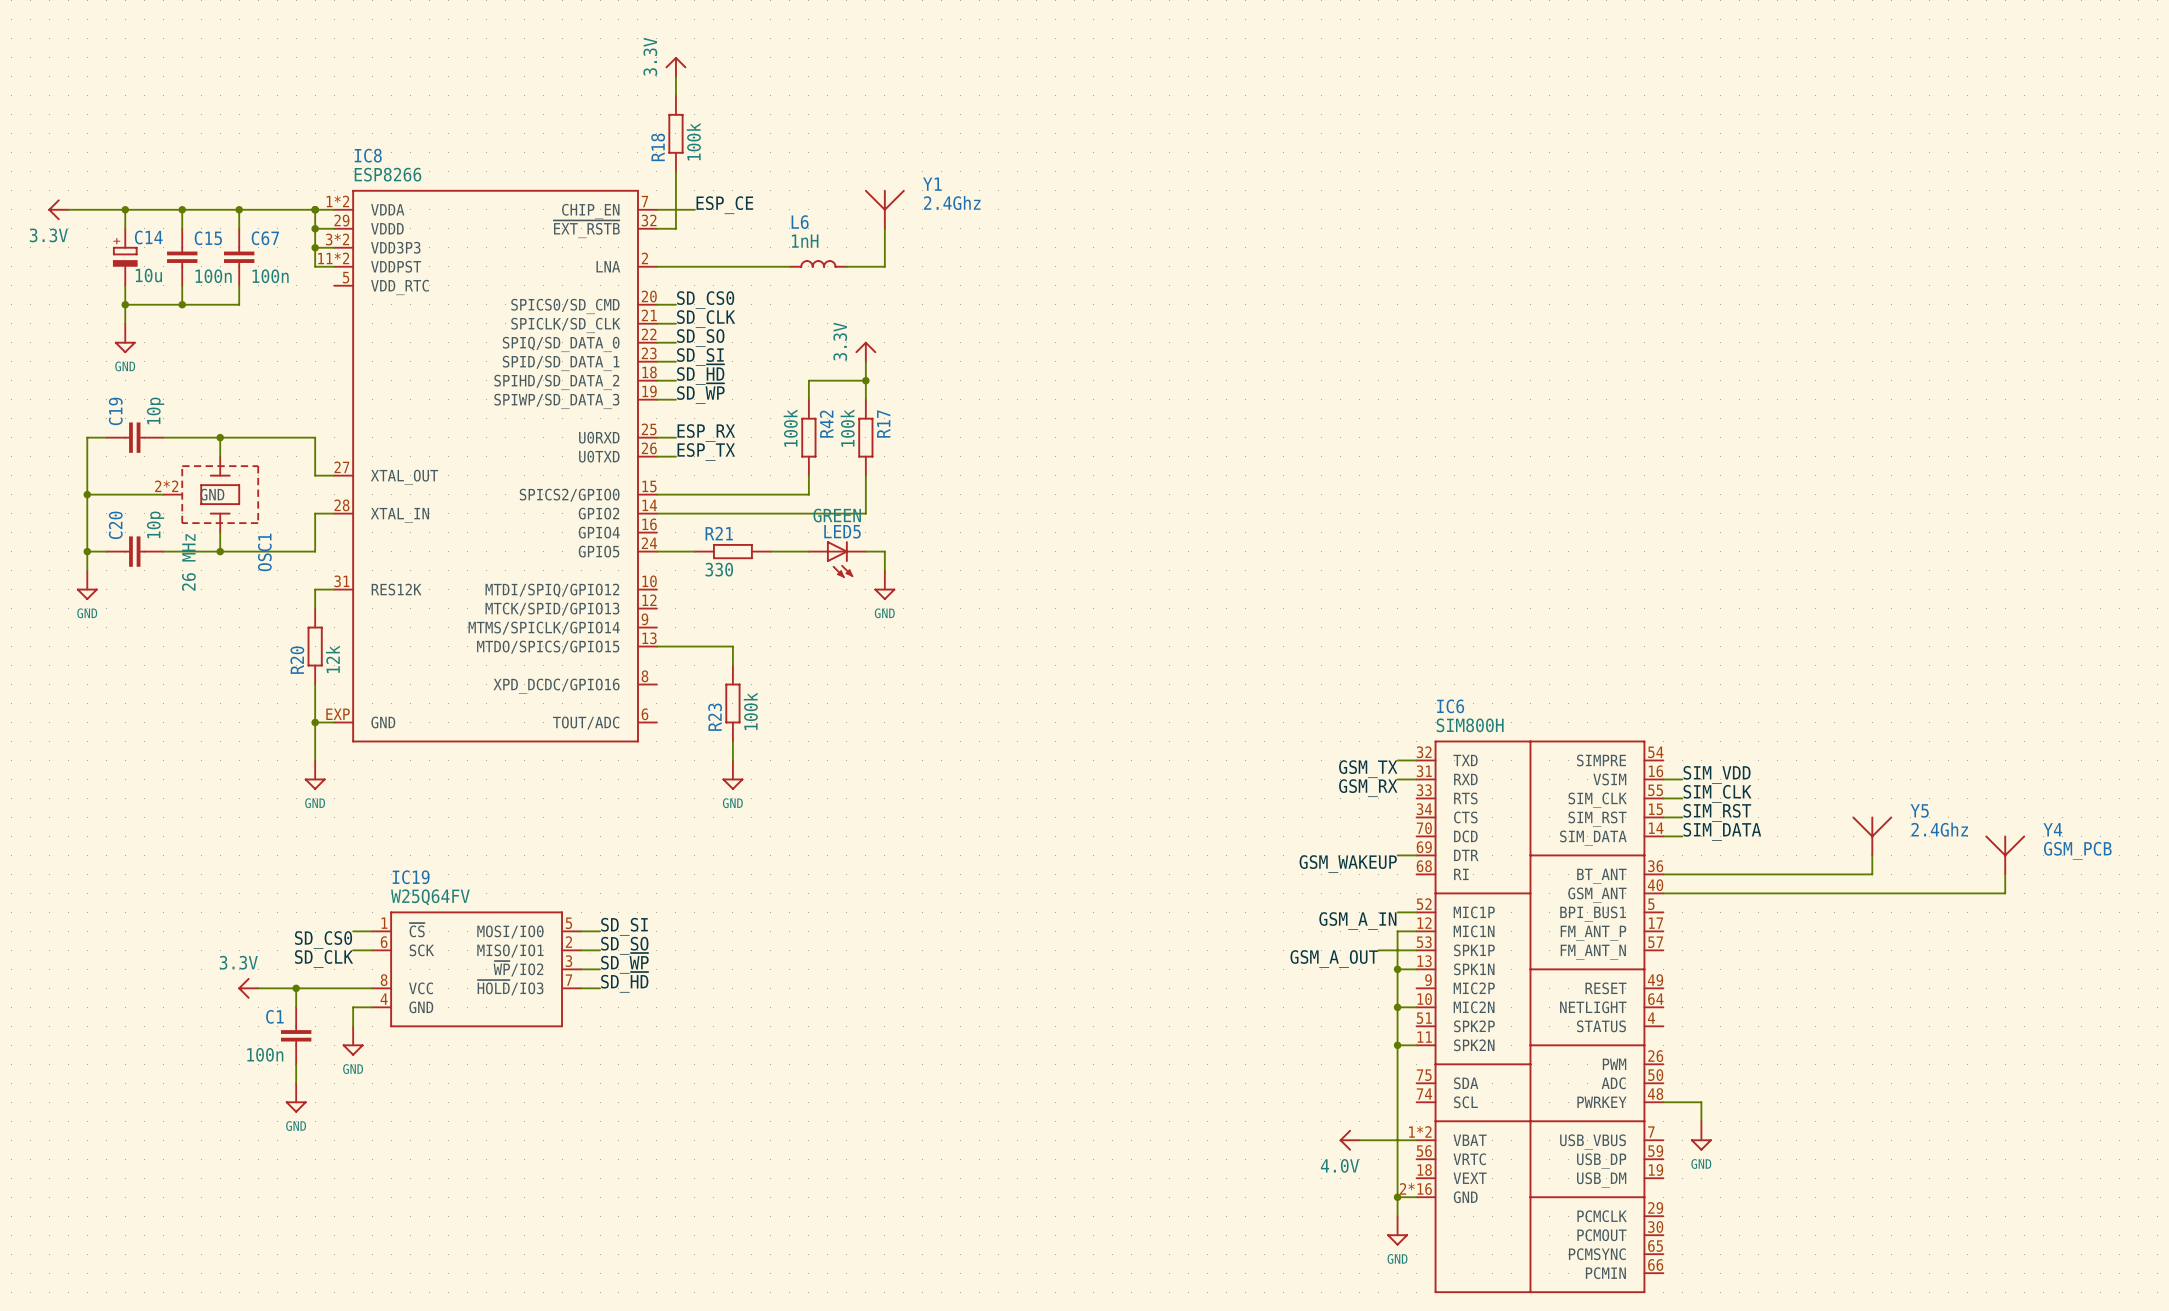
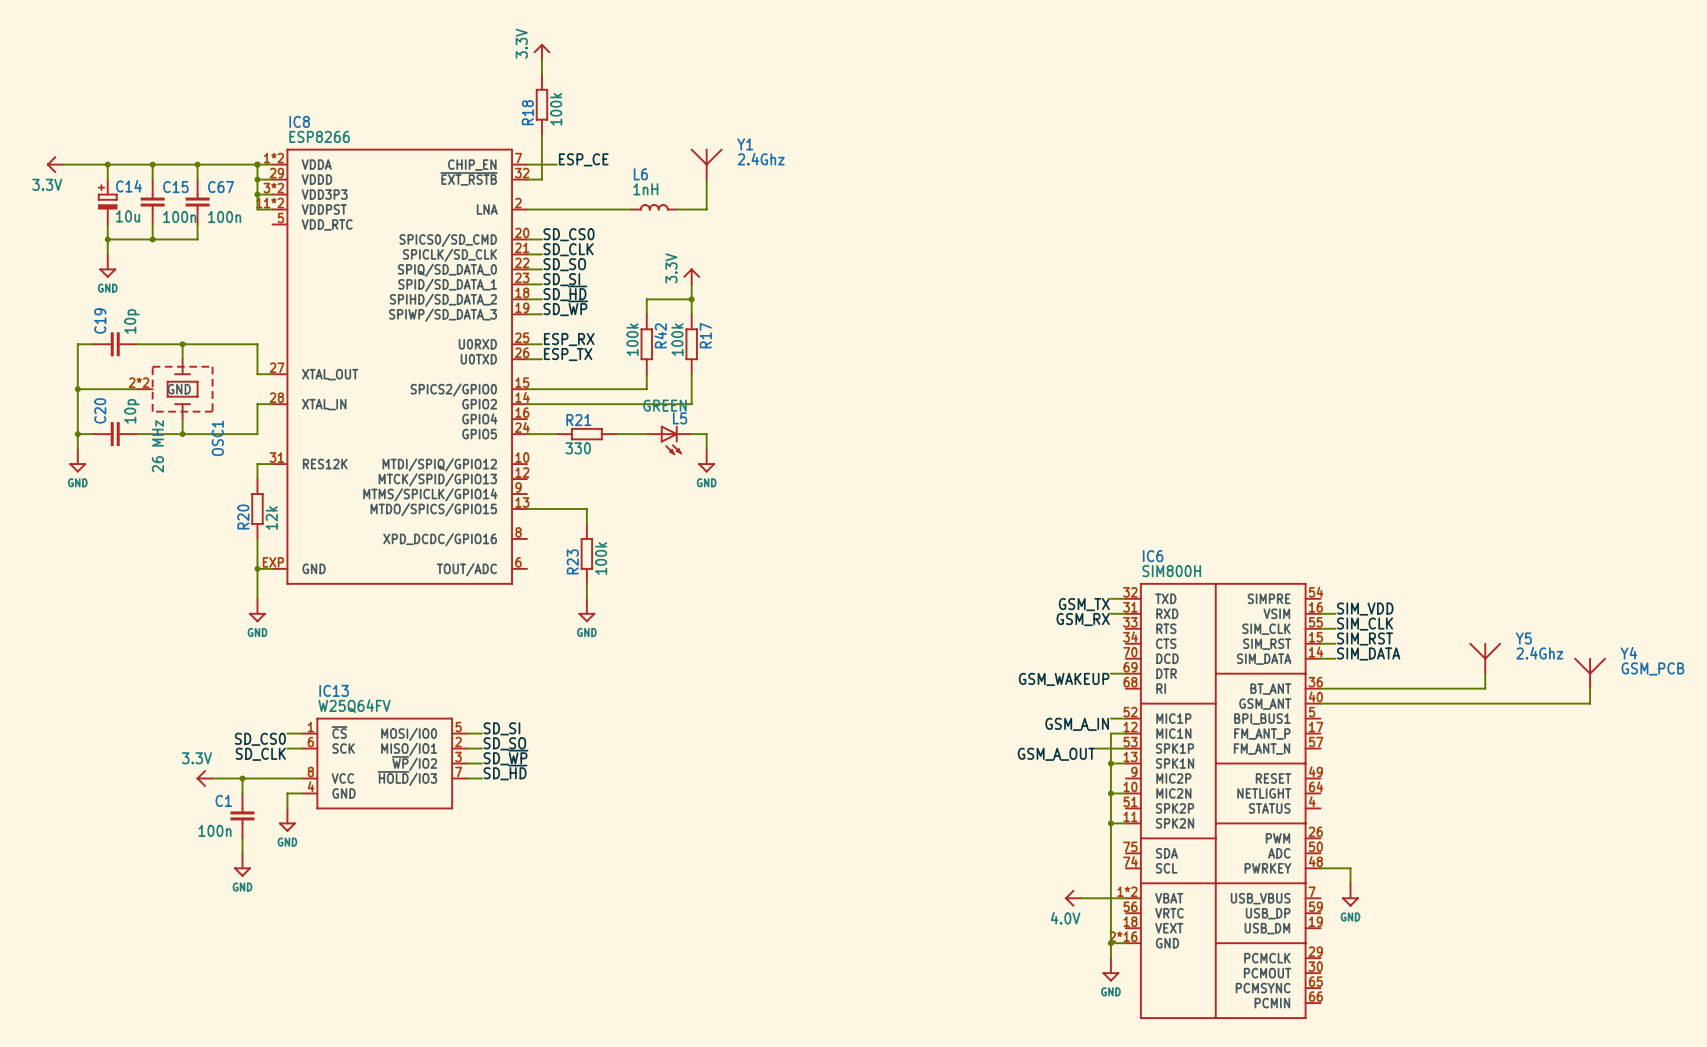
LED5 name: LED5 (842, 531) -> L5 (680, 418)
IC19 name: IC19 (411, 877) -> IC13 (334, 690)

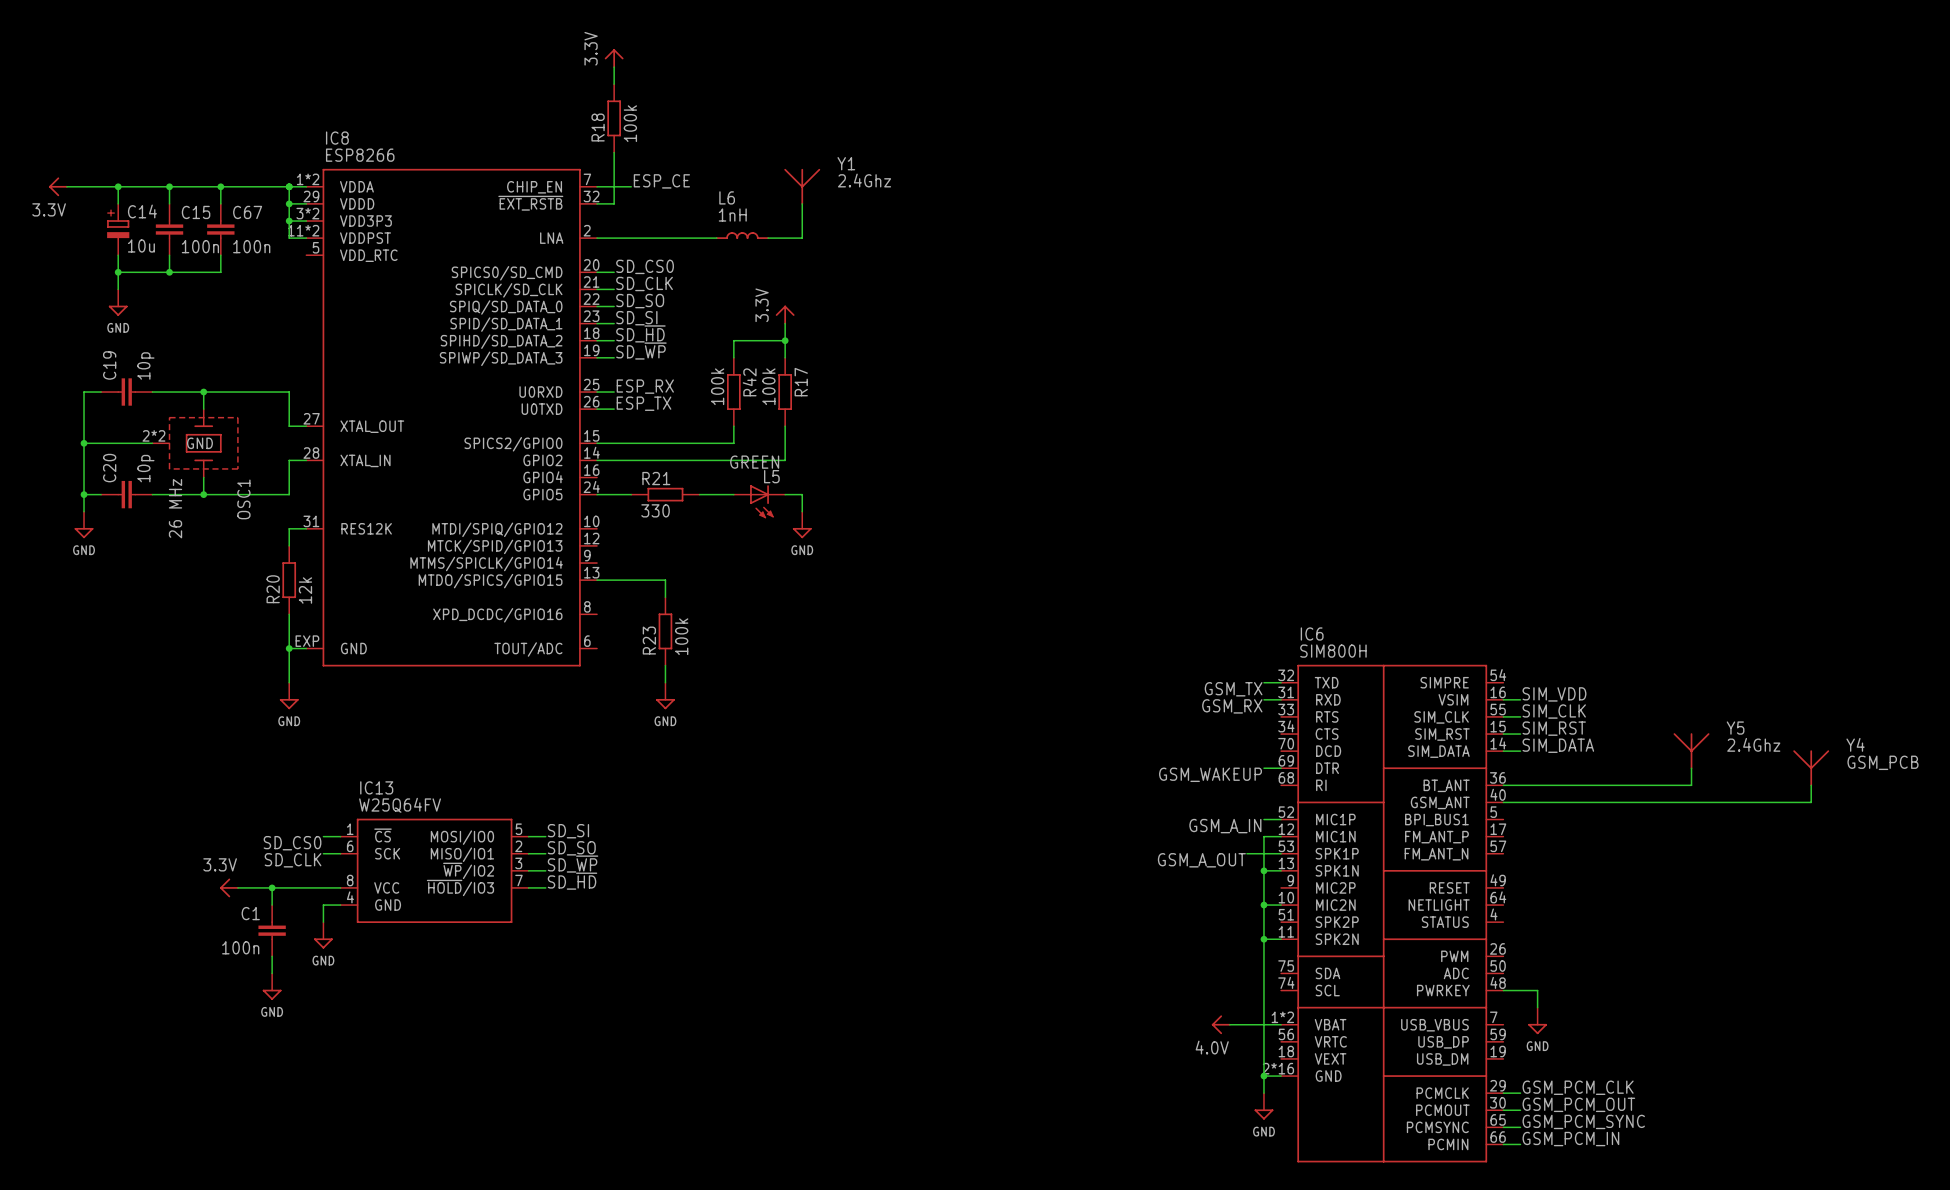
label: none -> GSM_PCM_CLK (1578, 1087)
wire: none -> (1503, 1093) (1520, 1093)
label: none -> GSM_PCM_OUT (1578, 1104)
wire: none -> (1503, 1110) (1520, 1110)
label: none -> GSM_PCM_SYNC (1583, 1121)
wire: none -> (1503, 1127) (1520, 1127)
label: none -> GSM_PCM_IN (1570, 1139)
wire: none -> (1503, 1144) (1520, 1144)

